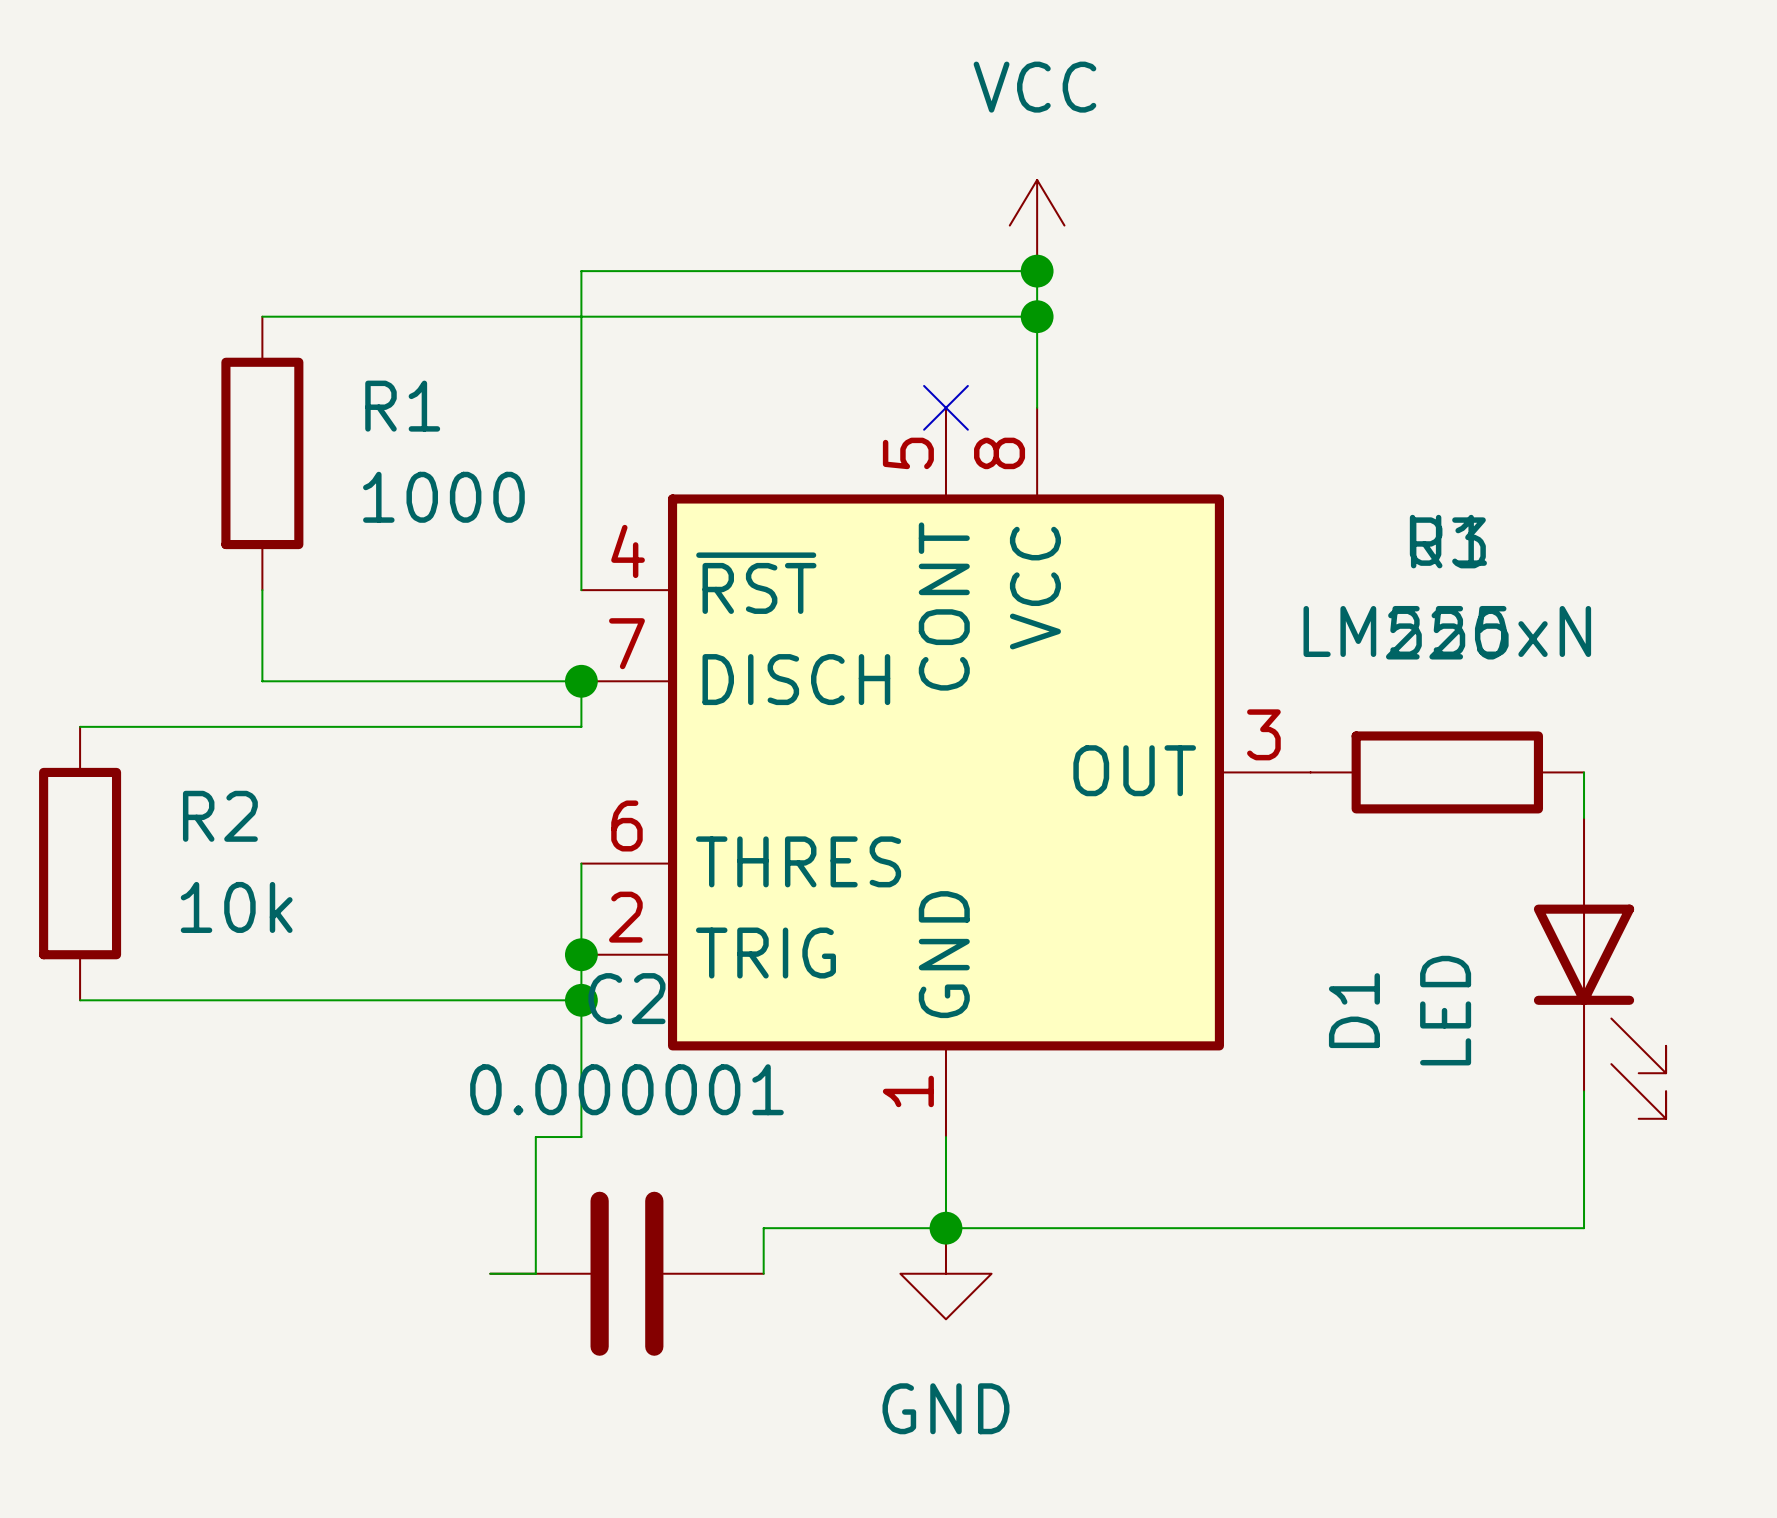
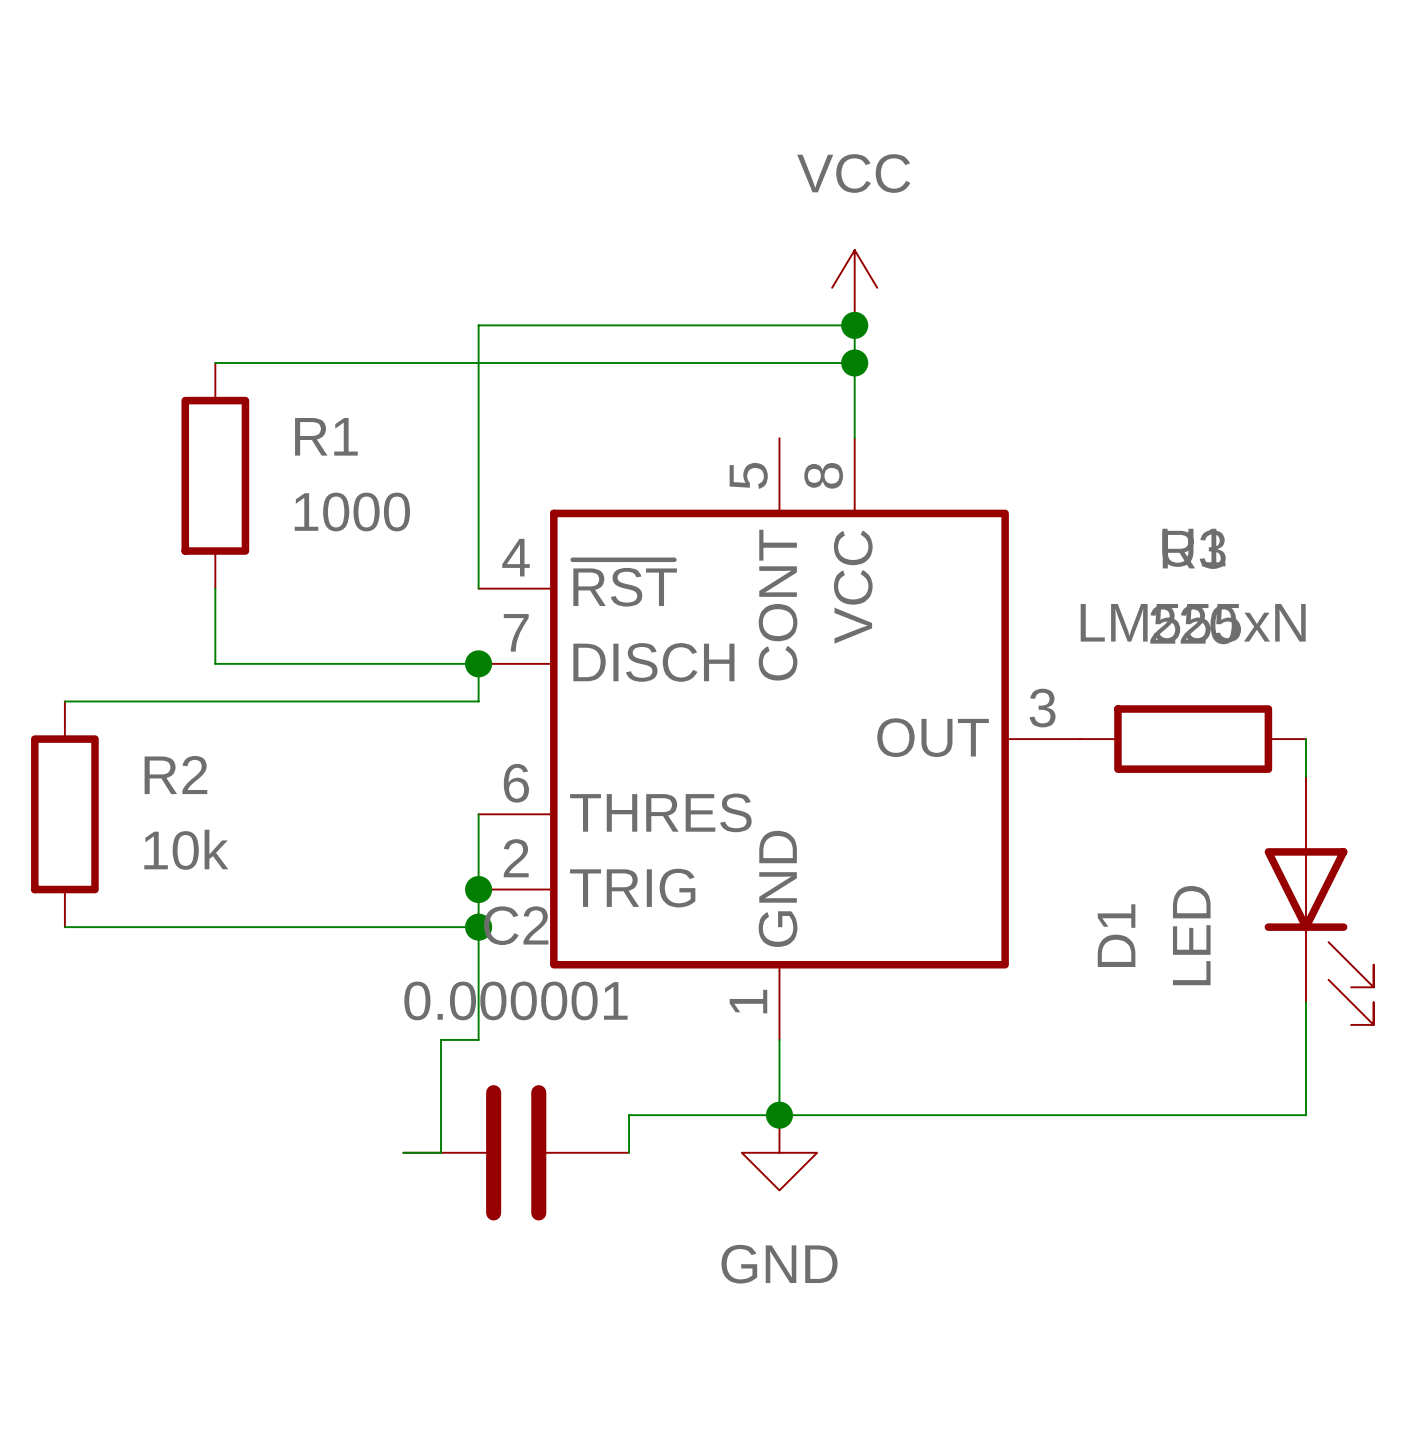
no-connect mark: (945, 407) -> none

